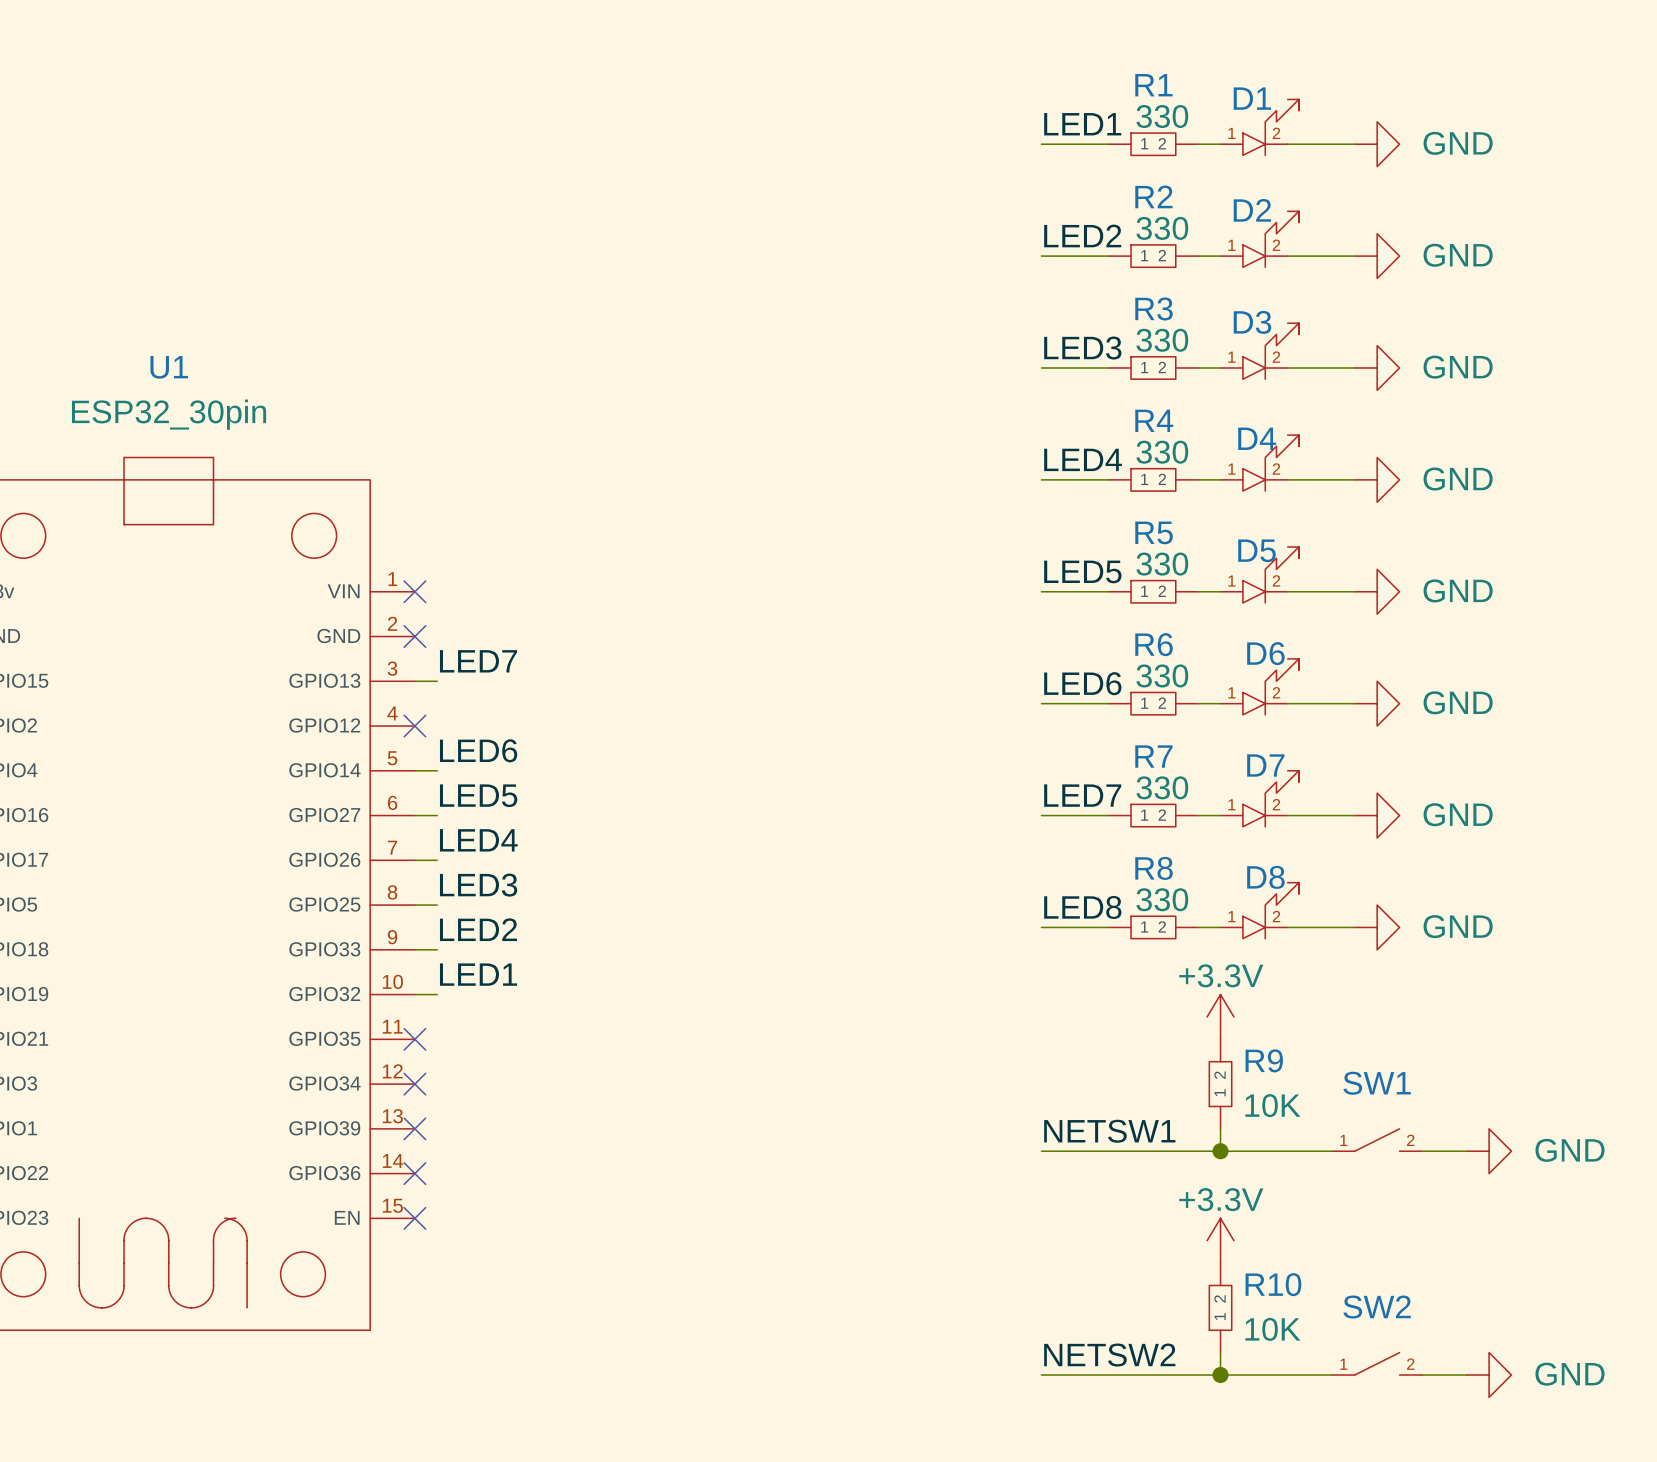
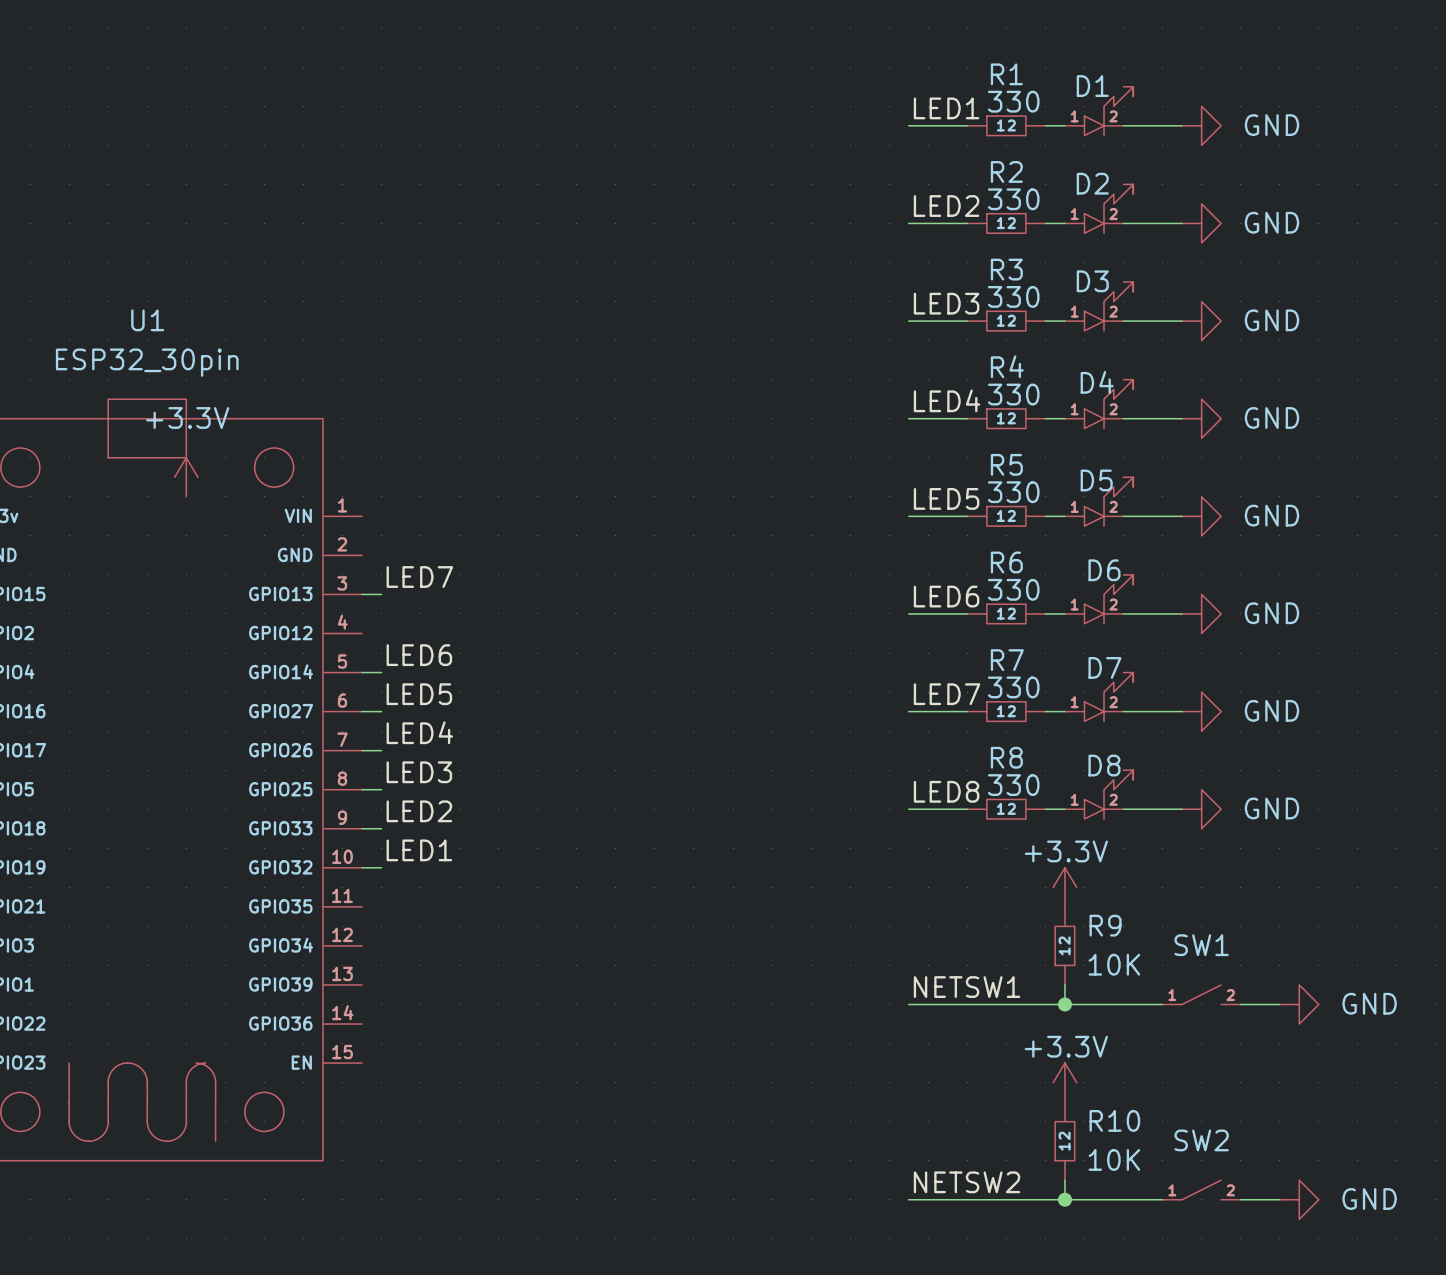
power symbol: none -> +3.3V (186, 477)
no-connect mark: (414, 591) -> none
no-connect mark: (414, 636) -> none
no-connect mark: (414, 726) -> none
no-connect mark: (414, 1039) -> none
no-connect mark: (414, 1084) -> none
no-connect mark: (414, 1128) -> none
no-connect mark: (414, 1173) -> none
no-connect mark: (414, 1218) -> none

